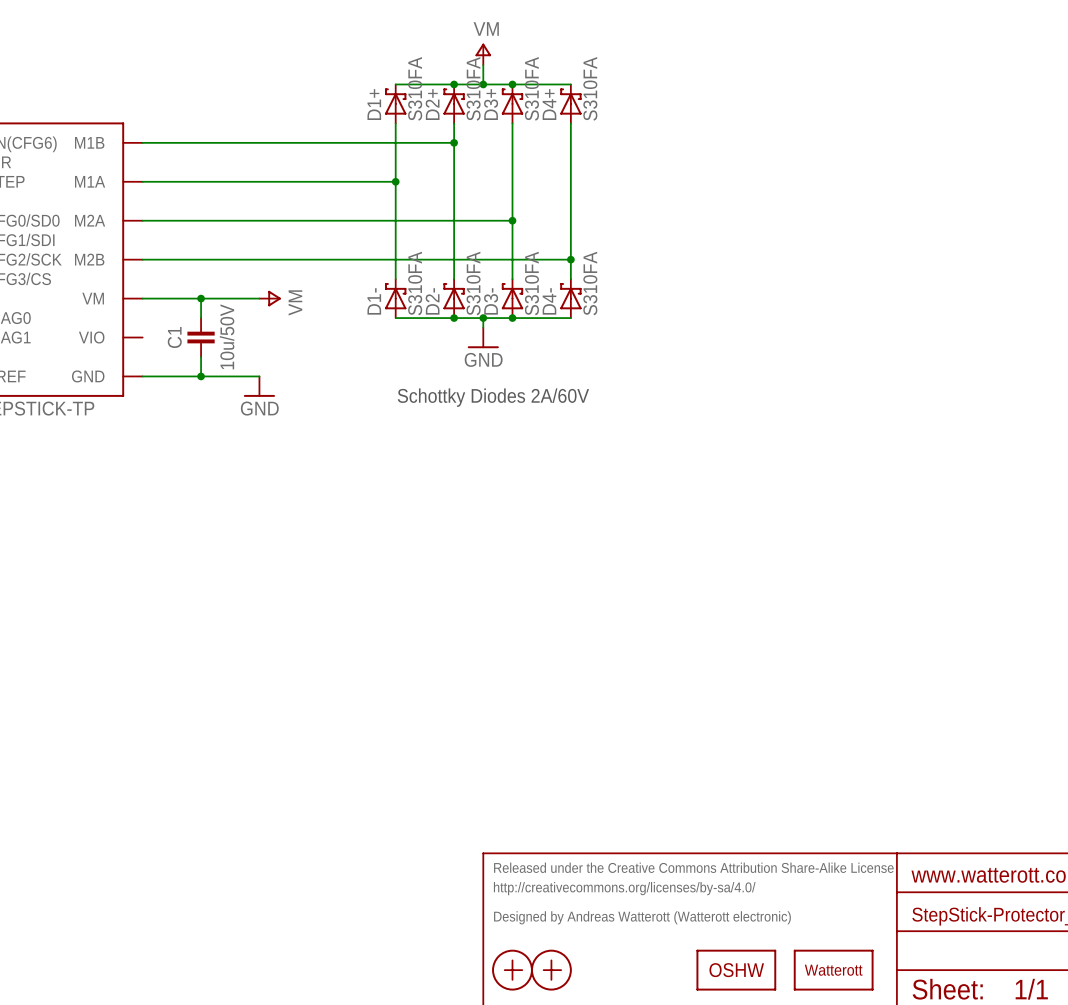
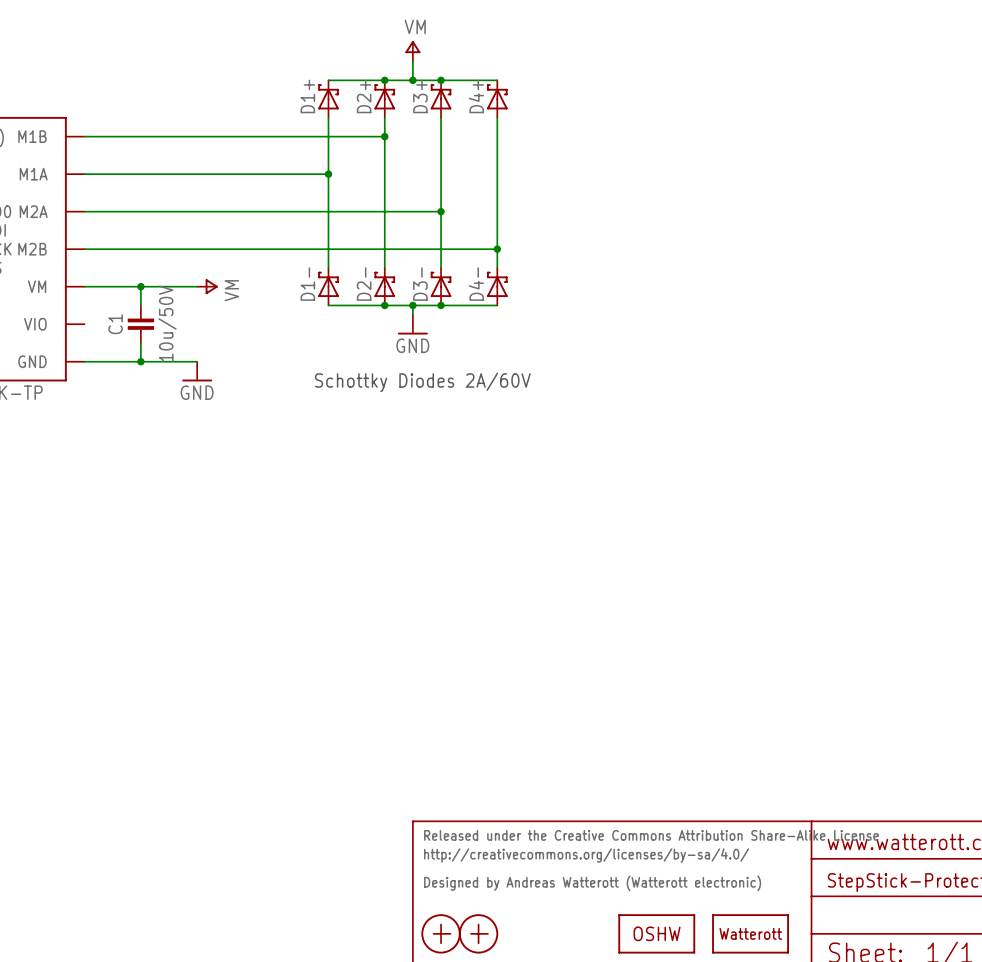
D1+ value: S310FA (415, 88) -> none
D2+ value: S310FA (473, 88) -> none
D3+ value: S310FA (531, 88) -> none
D4+ value: S310FA (590, 88) -> none
D1- value: S310FA (415, 283) -> none
D2- value: S310FA (473, 283) -> none
D3- value: S310FA (531, 283) -> none
D4- value: S310FA (590, 283) -> none

